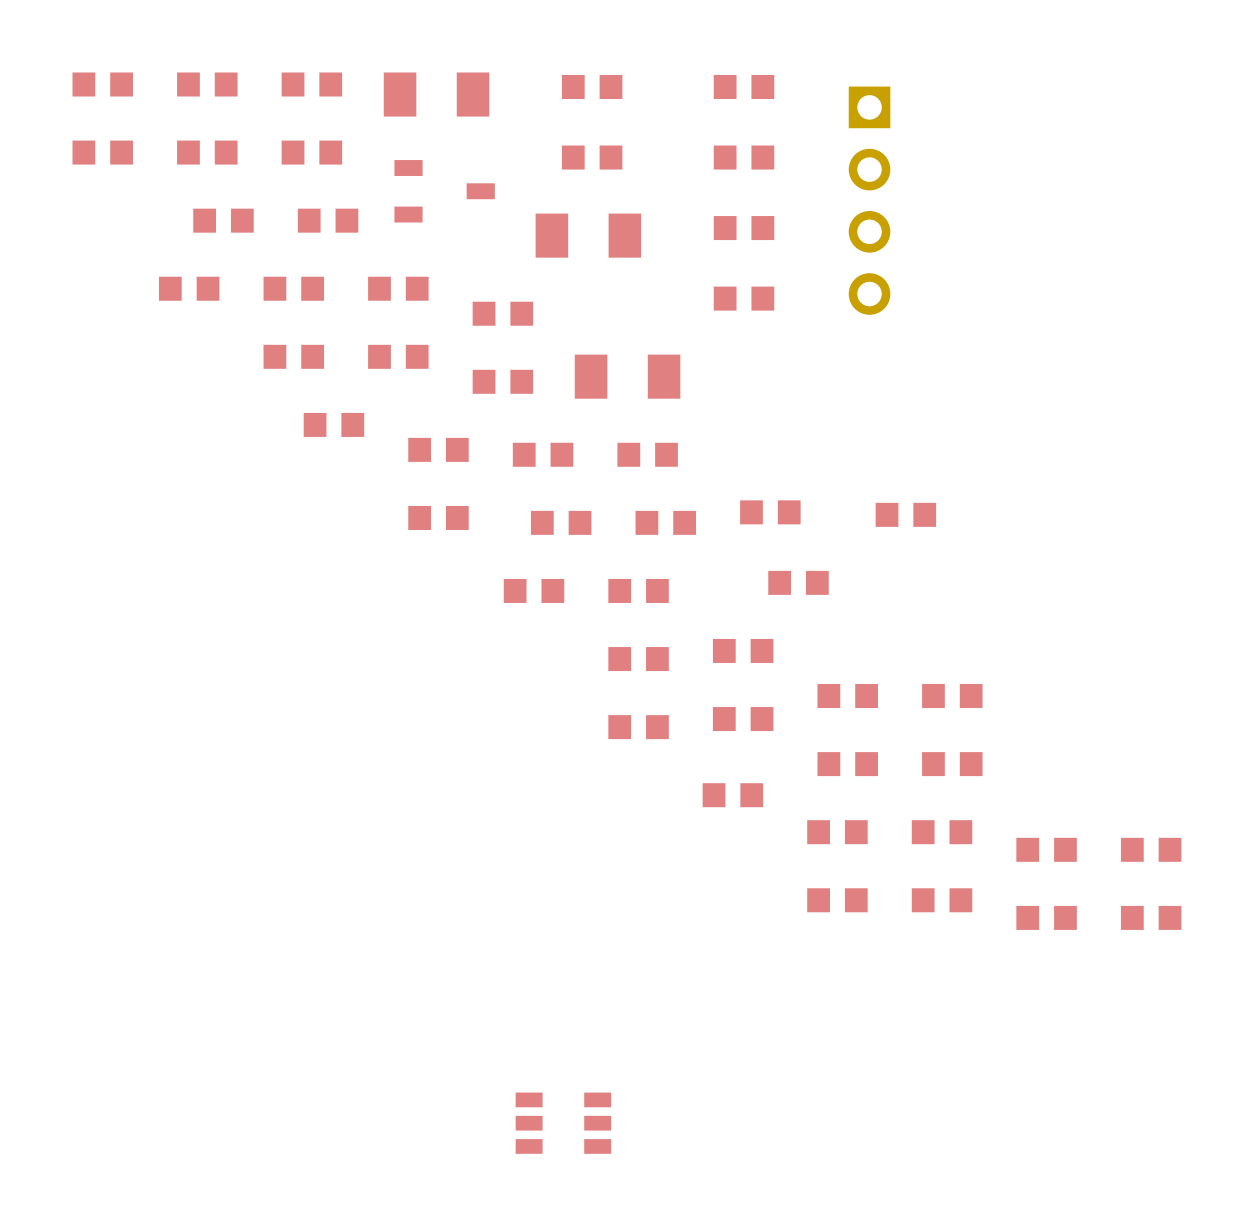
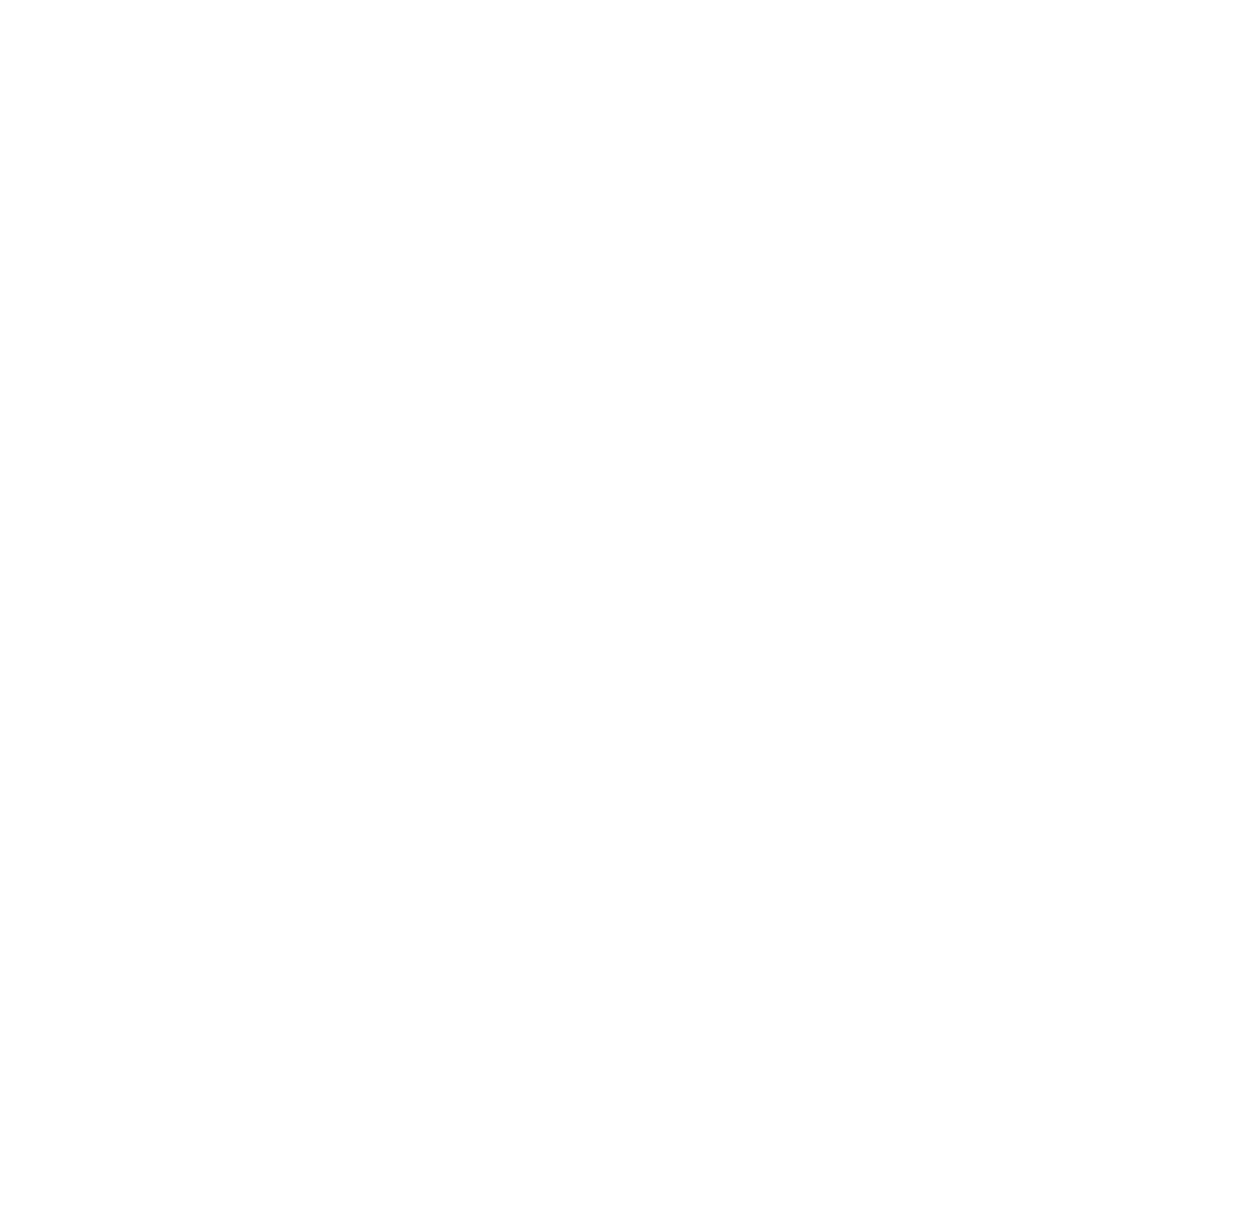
part: (102, 84) -> none
part: (207, 84) -> none
part: (311, 84) -> none
part: (592, 86) -> none
part: (743, 86) -> none
part: (436, 94) -> none
part: (102, 152) -> none
part: (207, 152) -> none
part: (311, 152) -> none
part: (592, 157) -> none
part: (743, 157) -> none
part: (444, 191) -> none
part: (869, 200) -> none
part: (223, 220) -> none
part: (328, 220) -> none
part: (743, 228) -> none
part: (588, 235) -> none
part: (189, 288) -> none
part: (293, 288) -> none
part: (398, 288) -> none
part: (743, 298) -> none
part: (502, 313) -> none
part: (293, 356) -> none
part: (398, 356) -> none
part: (627, 376) -> none
part: (502, 381) -> none
part: (333, 424) -> none
part: (438, 449) -> none
part: (543, 454) -> none
part: (647, 454) -> none
part: (770, 512) -> none
part: (905, 514) -> none
part: (438, 517) -> none
part: (561, 522) -> none
part: (665, 522) -> none
part: (798, 582) -> none
part: (534, 590) -> none
part: (638, 590) -> none
part: (743, 650) -> none
part: (638, 659) -> none
part: (847, 696) -> none
part: (952, 696) -> none
part: (743, 719) -> none
part: (638, 727) -> none
part: (847, 764) -> none
part: (952, 764) -> none
part: (732, 795) -> none
part: (837, 832) -> none
part: (942, 832) -> none
part: (1046, 849) -> none
part: (1151, 849) -> none
part: (837, 900) -> none
part: (942, 900) -> none
part: (1046, 917) -> none
part: (1151, 917) -> none
part: (563, 1123) -> none

